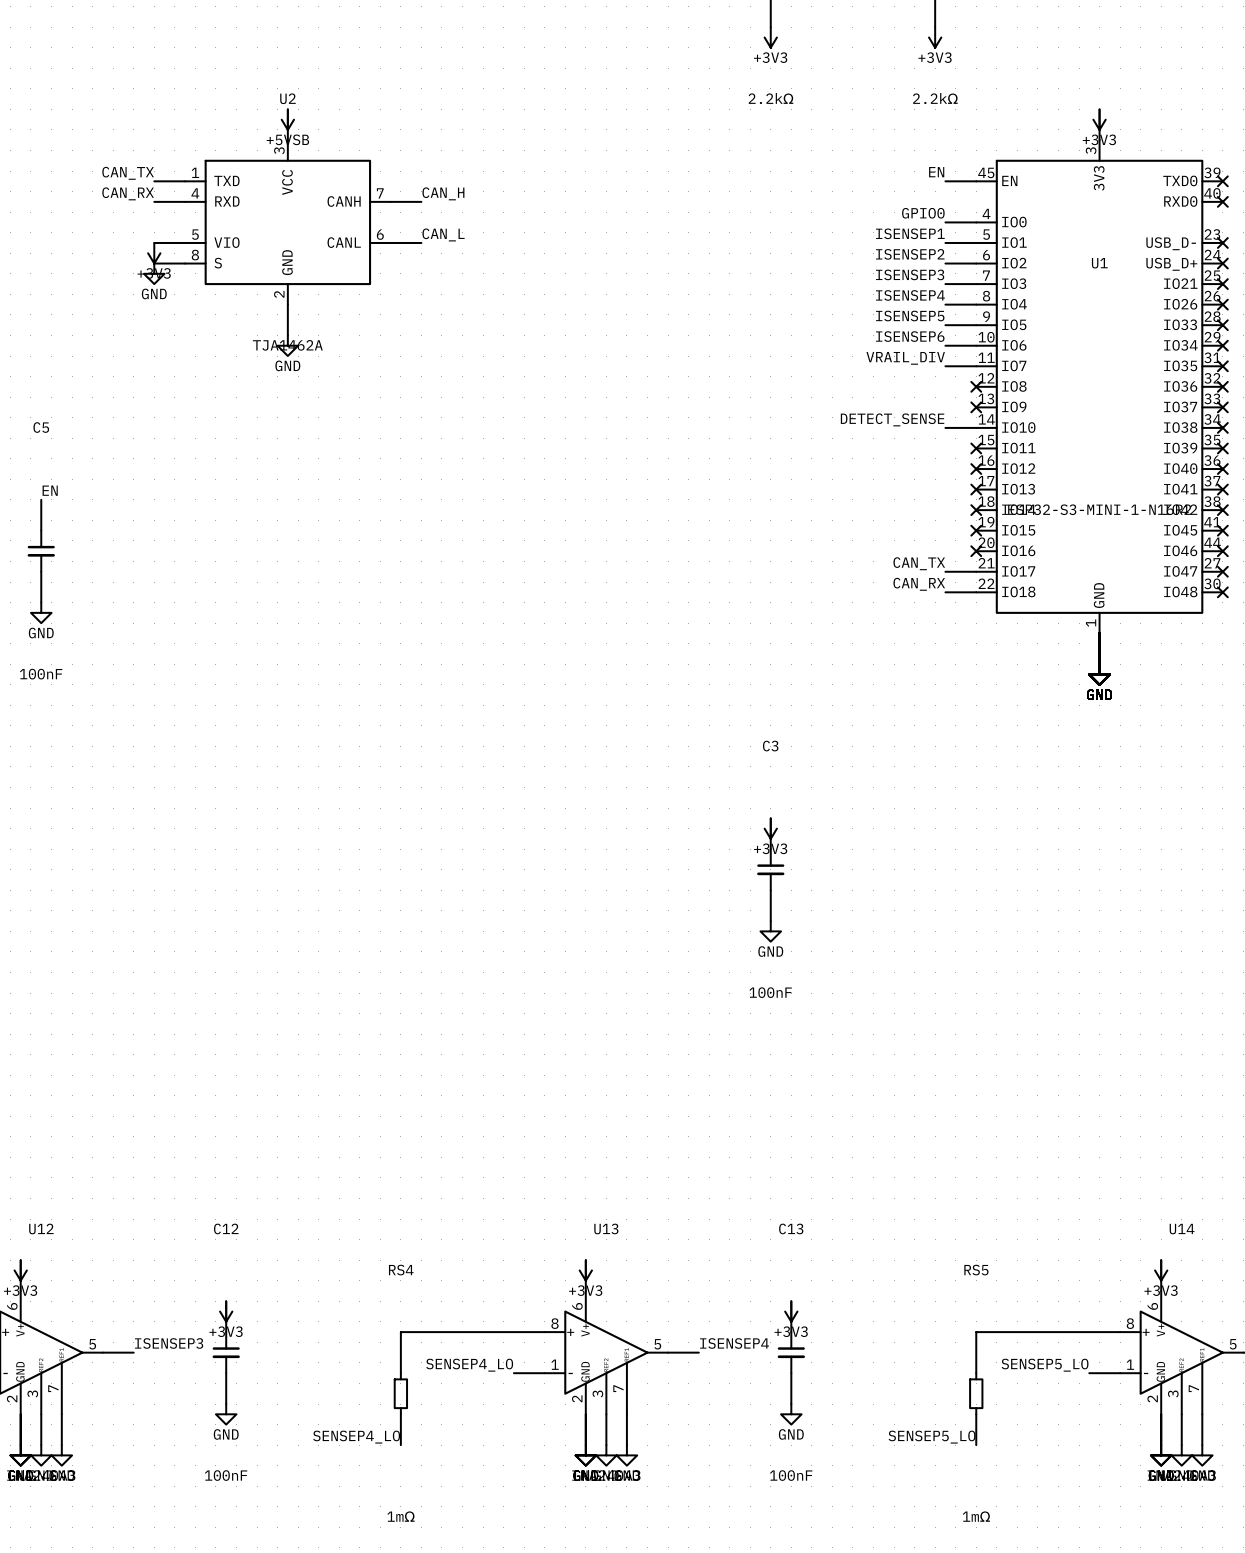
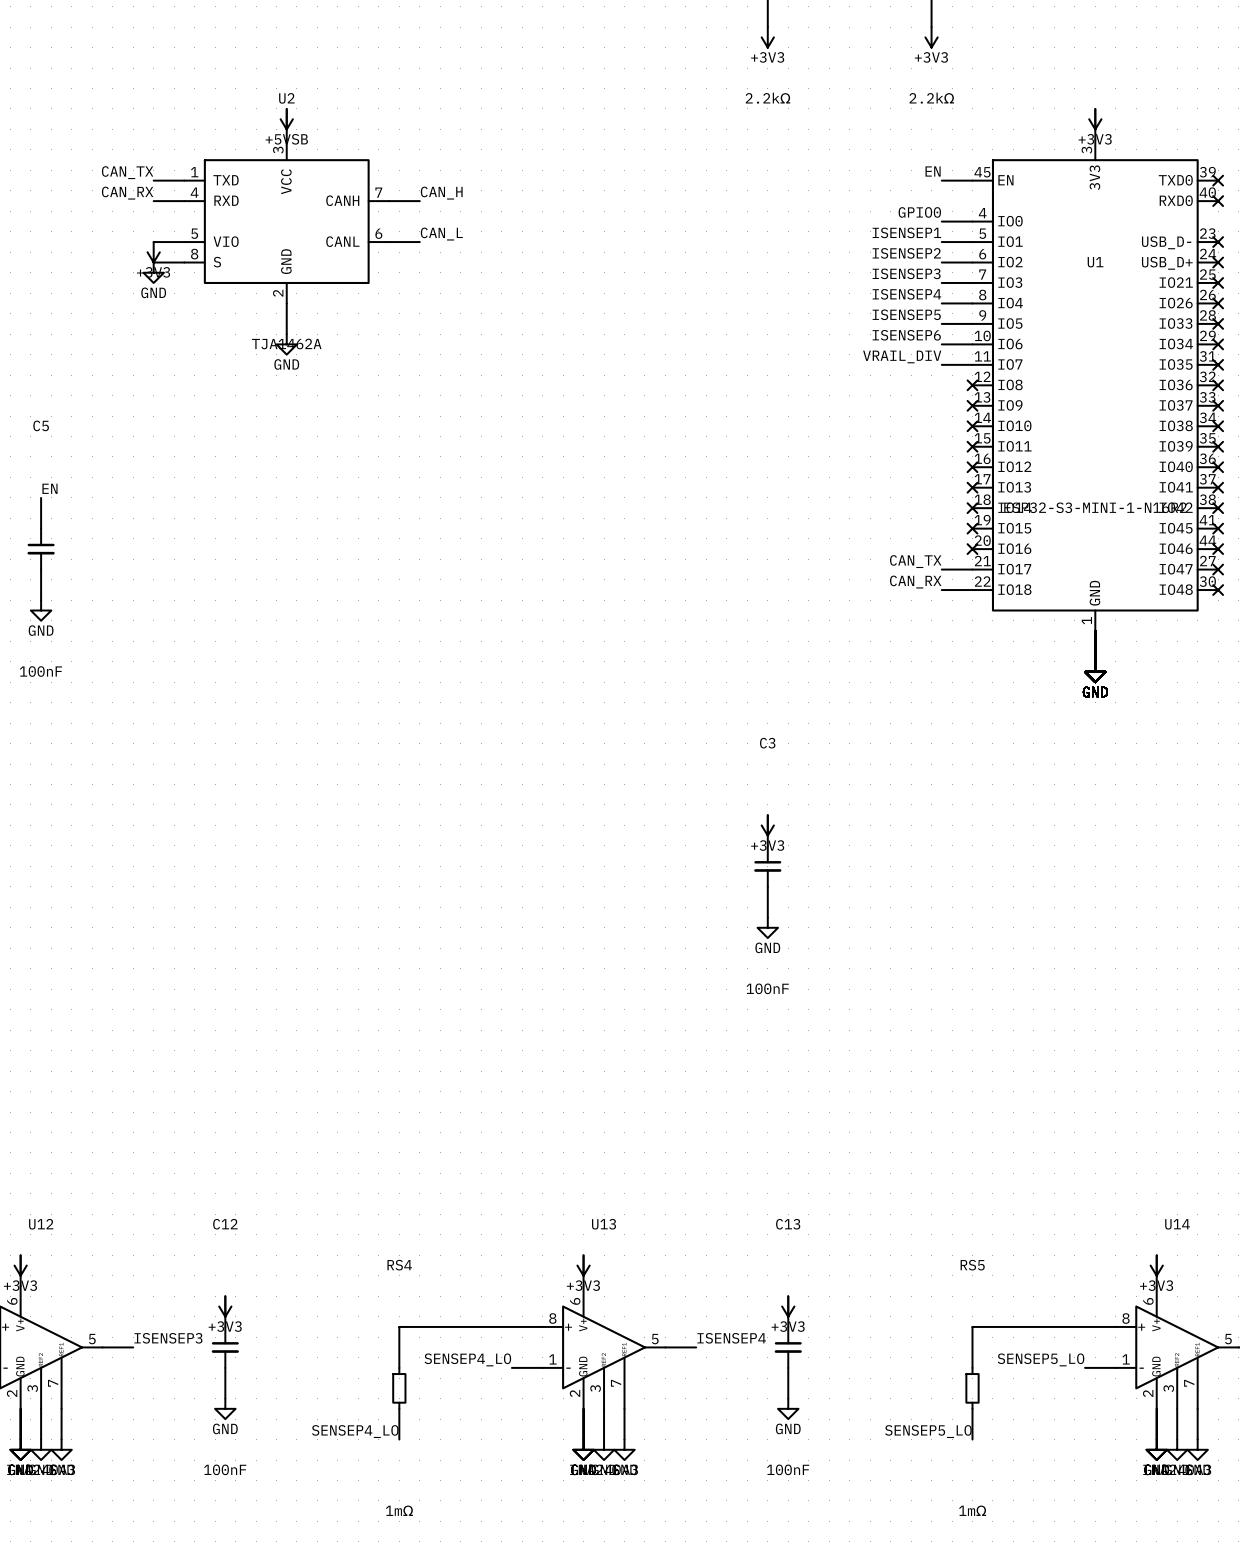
label: DETECT_SENSE (892, 419) -> none
wire: (945, 427) (976, 427) -> none
no-connect mark: none -> (972, 426)

